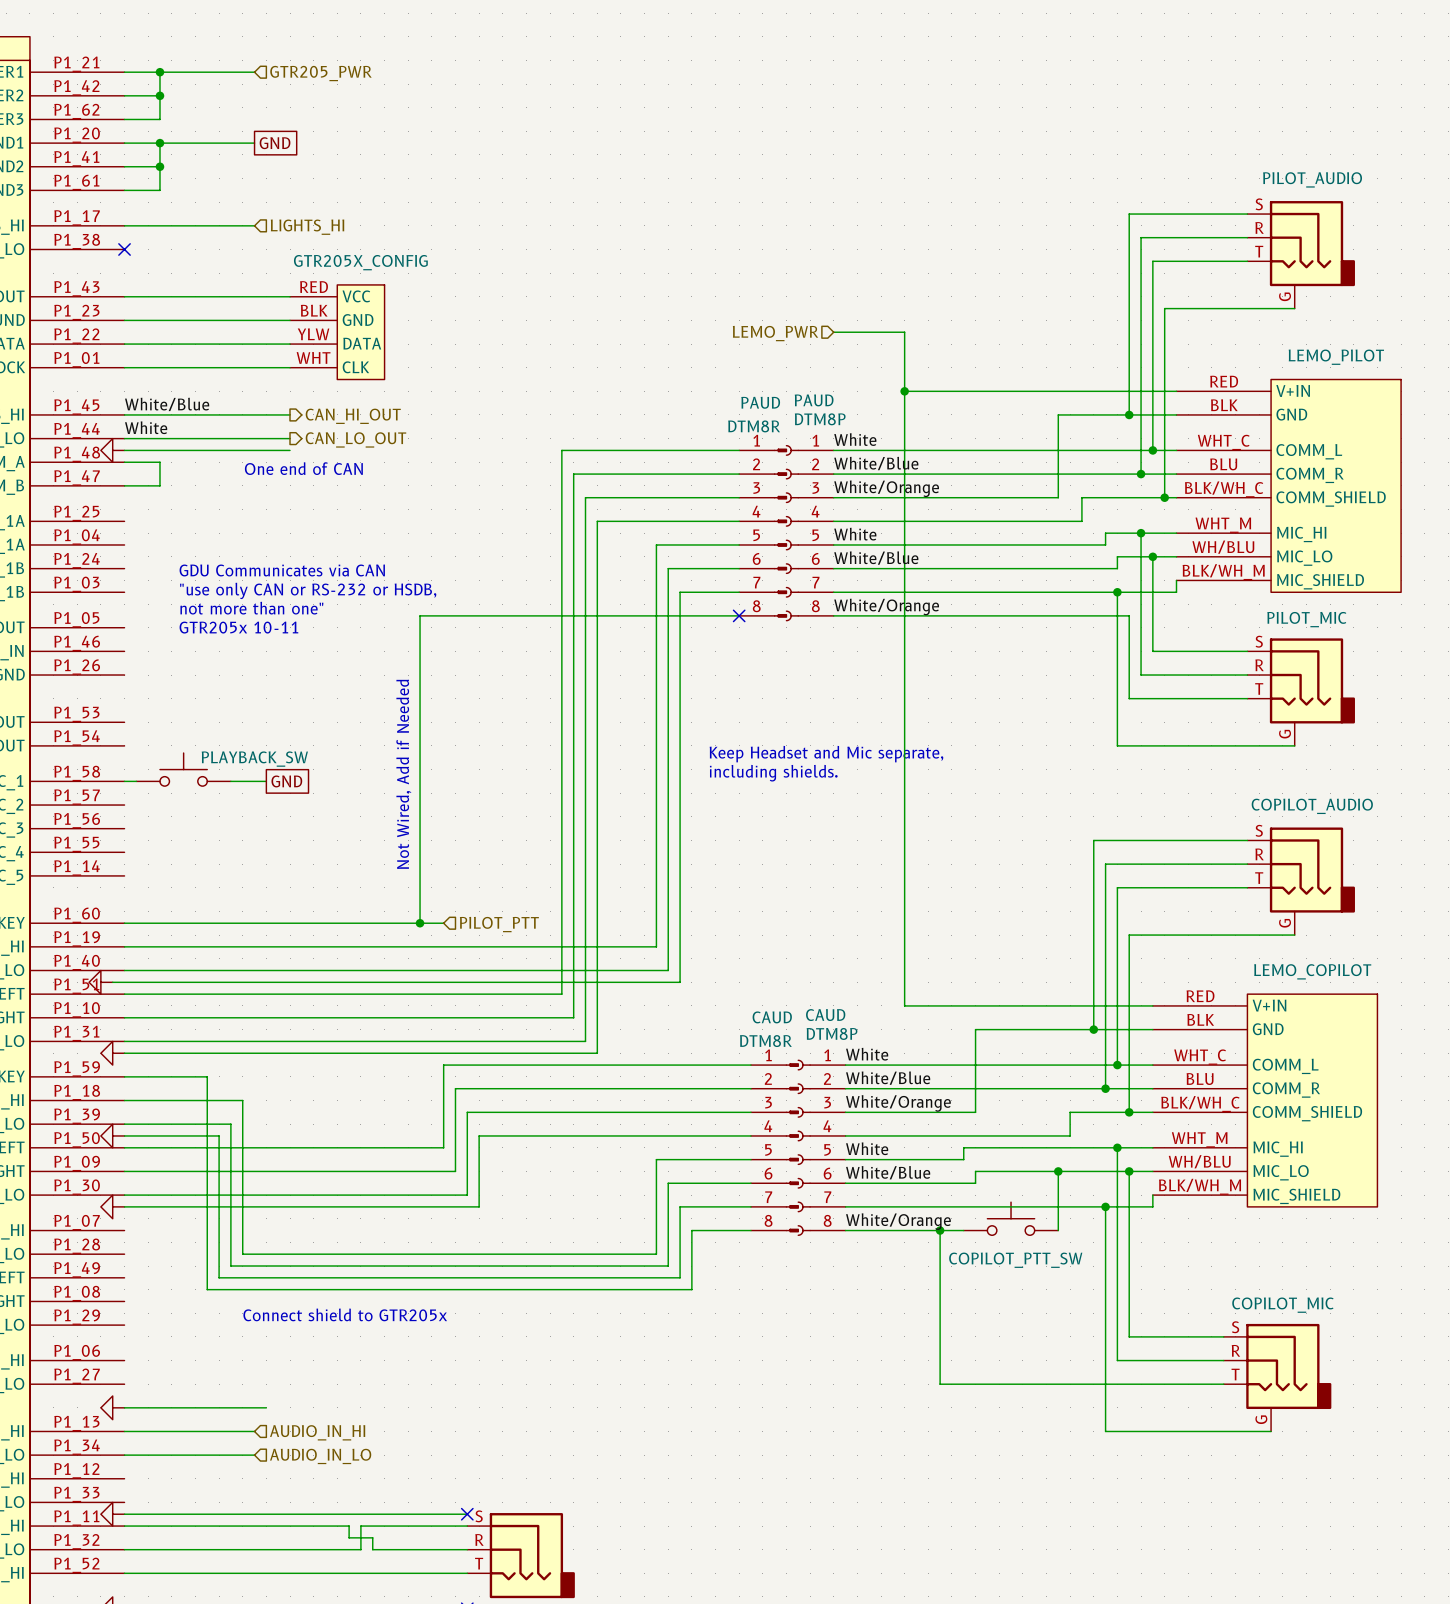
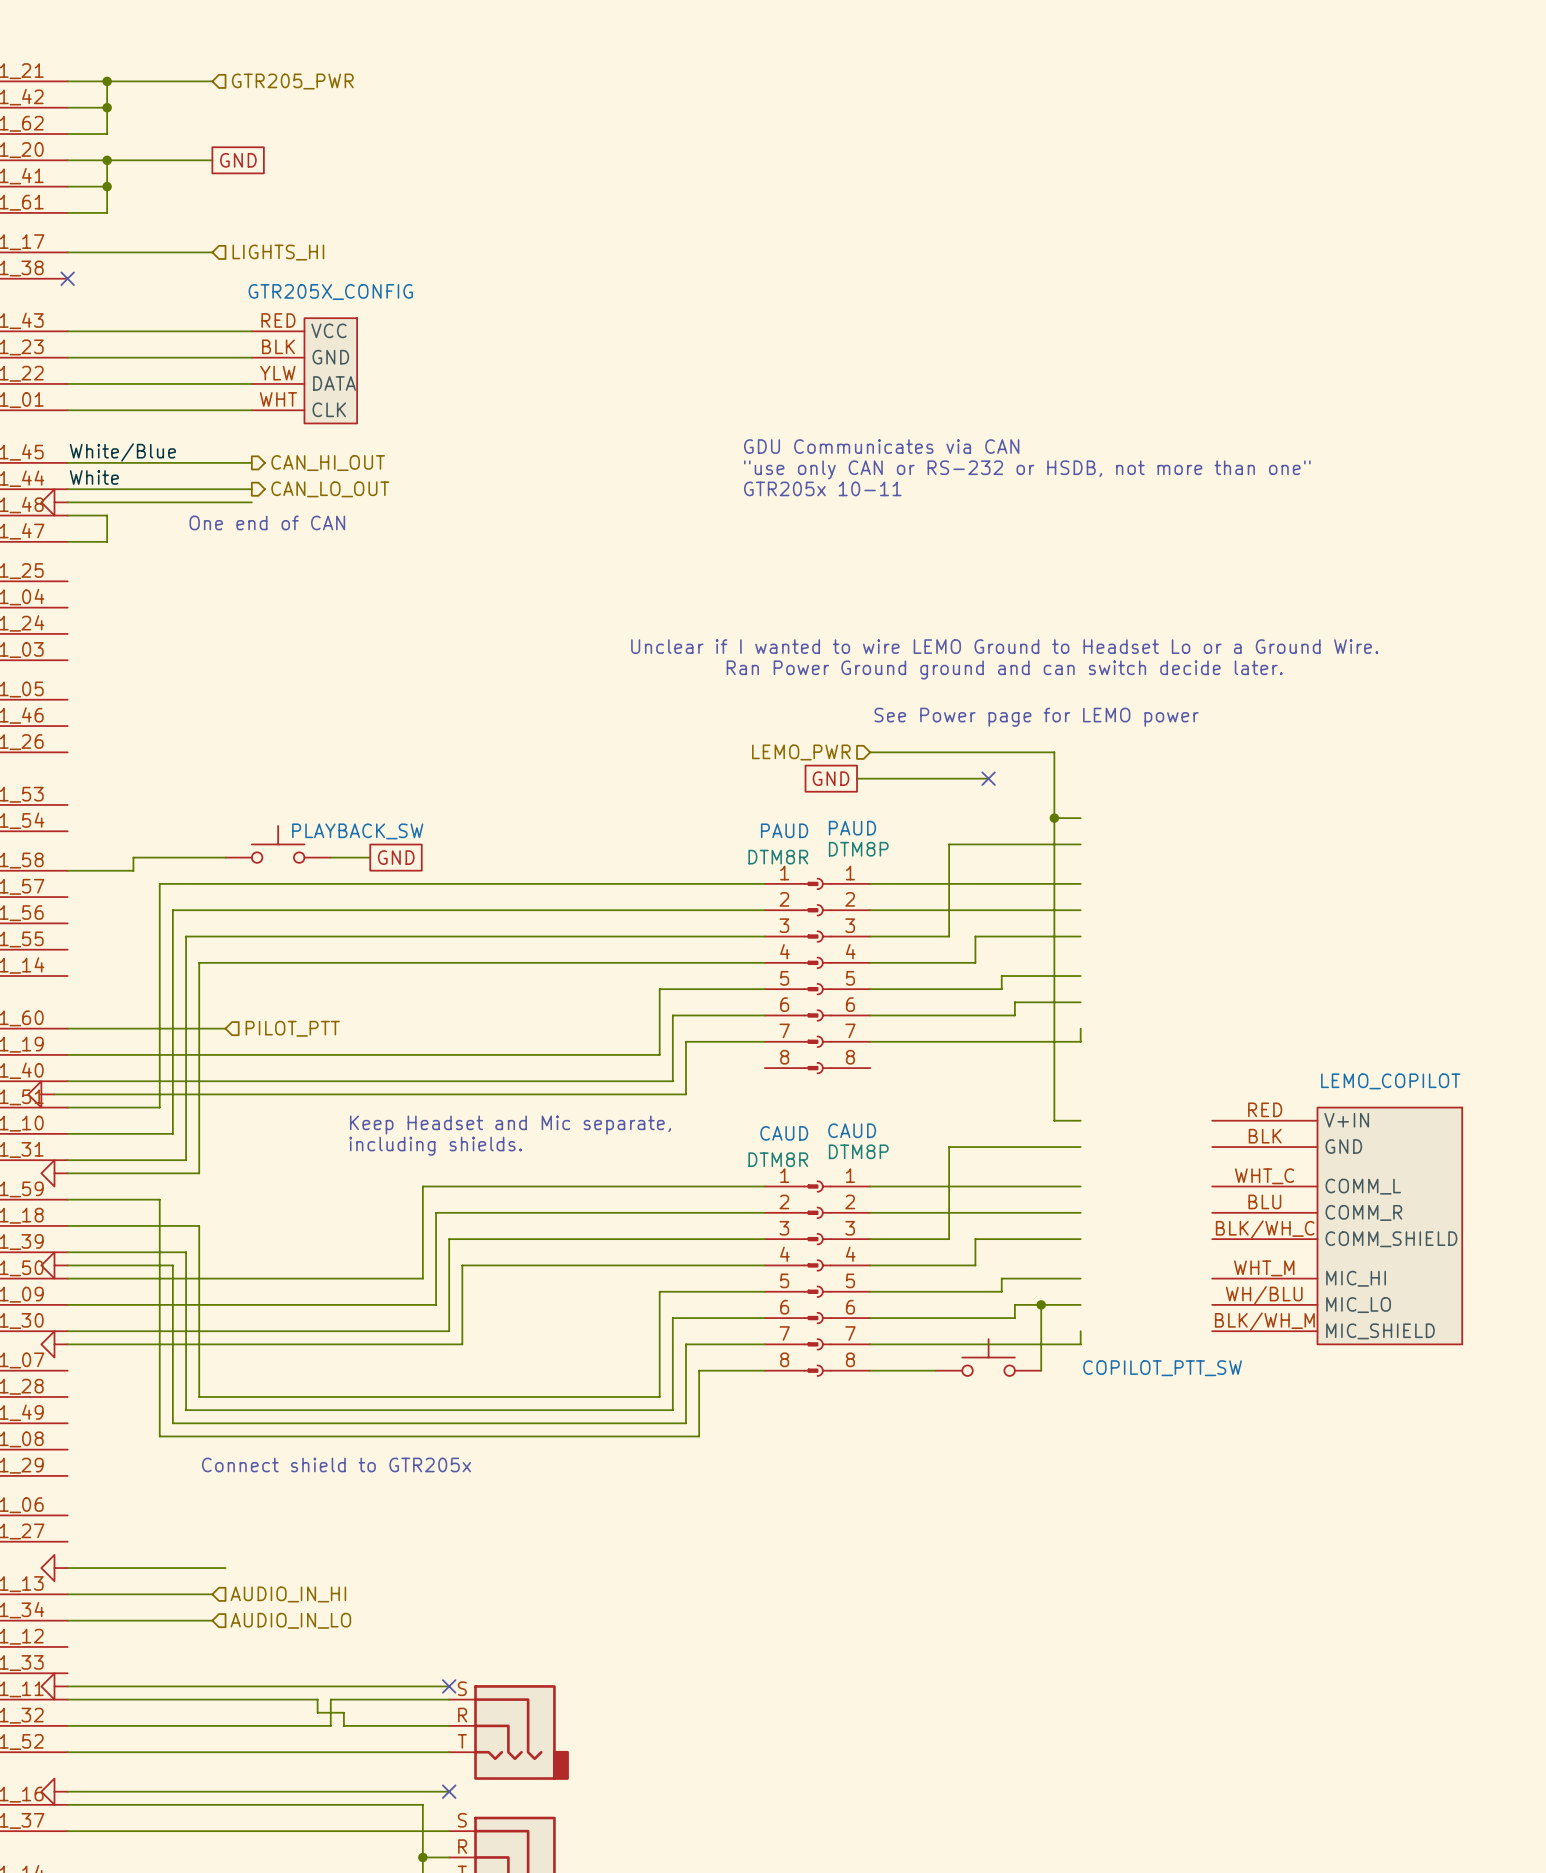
wire: (1247, 214) (1129, 214) (1129, 414) -> none
wire: (1247, 237) (1141, 237) (1141, 474) -> none
PILOT_AUDIO: (1301, 254) -> none
wire: (1247, 261) (1152, 261) (1152, 450) -> none
wire: (1294, 308) (1164, 308) (1164, 497) -> none
wire: (833, 332) (904, 332) (904, 1005) (1011, 1005) -> (870, 752) (1054, 752) (1054, 1120)
hierarchical label: LEMO_PWR (775, 333) -> none
wire: (904, 391) (1176, 391) -> none
junction: (904, 391) -> none
text: none -> GDU Communicates via CAN (881, 446)
junction: (1129, 414) -> none
wire: (1176, 414) (1058, 414) (1058, 497) (833, 497) -> none
text: none -> "use only CAN or RS-232 or HSDB, not more than one" (1027, 469)
text: none -> GTR205x 10-11 (822, 488)
label: White (855, 439) -> none
wire: (739, 450) (561, 450) (561, 994) (207, 994) -> (764, 883) (159, 883) (159, 1107)
wire: (833, 450) (1176, 450) -> none
junction: (1152, 450) -> none
label: White/Blue (876, 463) -> none
wire: (739, 474) (573, 474) (573, 1017) (219, 1017) -> (764, 910) (172, 910) (172, 1133)
wire: (833, 474) (1176, 474) -> none
junction: (1141, 474) -> none
LEMO_PILOT: (1288, 485) -> none
label: White/Orange (886, 488) -> none
wire: (739, 497) (585, 497) (585, 1041) (230, 1041) -> (764, 936) (186, 936) (186, 1160)
junction: (1164, 497) -> none
wire: (1176, 497) (1081, 497) (1081, 521) (833, 521) -> none
wire: (739, 521) (597, 521) (597, 1053) (242, 1053) -> (764, 962) (199, 962) (199, 1173)
PAUD: DTM8R (763, 533) -> none
PAUD: DTM8P (809, 533) -> none
wire: (1141, 533) (1141, 675) (1247, 675) -> none
junction: (1141, 533) -> none
wire: (1176, 533) (1105, 533) (1105, 544) (833, 544) -> none
label: White (855, 534) -> none
wire: (739, 544) (656, 544) (656, 887) -> (764, 989) (659, 989)
wire: (1152, 556) (1152, 651) (1247, 651) -> none
junction: (1152, 556) -> none
wire: (1176, 556) (1117, 556) (1117, 568) (833, 568) -> none
label: White/Blue (876, 558) -> none
wire: (739, 568) (668, 568) (668, 911) -> (764, 1015) (672, 1015)
text: GDU Communicates via CAN (282, 570) -> none
text: none -> Unclear if I wanted to wire LEMO Ground to Headset Lo or a Ground Wire. (1004, 646)
wire: (1176, 580) (1176, 592) (833, 592) -> none
text: "use only CAN or RS-232 or HSDB, (308, 590) -> none
wire: (739, 592) (680, 592) (680, 935) -> (764, 1041) (685, 1041)
wire: (1117, 592) (1117, 745) (1294, 745) -> none
junction: (1117, 592) -> none
text: none -> Ran Power Ground ground and can switch decide later. (1004, 669)
label: White/Orange (886, 606) -> none
text: not more than one" (251, 608) -> none
wire: (739, 615) (420, 615) (420, 923) -> none
no-connect mark: (739, 615) -> none
wire: (833, 615) (1129, 615) (1129, 698) (1247, 698) -> none
text: GTR205x 10-11 (238, 627) -> none
text: none -> See Power page for LEMO power (1036, 717)
hierarchical label: none -> LEMO_PWR (801, 752)
PILOT_MIC: (1301, 692) -> none
global label: none -> GND (831, 778)
wire: none -> (857, 778) (988, 778)
no-connect mark: none -> (988, 778)
wire: none -> (1054, 818) (1080, 818)
junction: none -> (1054, 818)
text: Keep Headset and Mic separate, (826, 754) -> none
wire: none -> (1080, 844) (949, 844) (949, 936) (870, 936)
PLAYBACK_SW position: (183, 769) -> (278, 844)
wire: none -> (225, 857) (133, 857) (133, 870) (80, 870)
text: including shields. (773, 773) -> none
text: Not Wired, Add if Needed (403, 774) -> none
wire: (230, 781) (266, 781) -> (330, 857) (370, 857)
global label position: GND (286, 781) -> GND (396, 857)
wire: none -> (870, 883) (1080, 883)
wire: none -> (870, 910) (1080, 910)
wire: none -> (1080, 936) (975, 936) (975, 962) (870, 962)
wire: (1247, 840) (1093, 840) (1093, 1029) -> none
wire: (1247, 864) (1105, 864) (1105, 1088) -> none
PAUD: none -> DTM8R (791, 976)
PAUD: none -> DTM8P (843, 976)
wire: none -> (1080, 976) (1001, 976) (1001, 989) (870, 989)
COPILOT_AUDIO: (1301, 881) -> none
wire: (1247, 887) (1117, 887) (1117, 1065) -> none
wire: none -> (1080, 1002) (1014, 1002) (1014, 1015) (870, 1015)
wire: (266, 923) (443, 923) -> none
junction: (420, 923) -> none
wire: none -> (1080, 1028) (1080, 1041) (870, 1041)
hierarchical label position: PILOT_PTT (499, 924) -> PILOT_PTT (292, 1028)
wire: (1294, 935) (1129, 935) (1129, 1112) -> none
wire: (1034, 1005) (1152, 1005) -> none
text: none -> Keep Headset and Mic separate, (510, 1125)
text: none -> including shields. (435, 1146)
wire: (975, 1029) (975, 1112) -> (1014, 1147) (949, 1147) (949, 1239)
wire: (1034, 1029) (1152, 1029) -> none
junction: (1093, 1029) -> none
label: White (867, 1054) -> none
wire: (1034, 1065) (1152, 1065) -> none
junction: (1117, 1065) -> none
label: White/Blue (888, 1078) -> none
wire: (1034, 1088) (1152, 1088) -> none
junction: (1105, 1088) -> none
label: White/Orange (898, 1103) -> none
wire: (916, 1112) (940, 1112) -> (975, 1265) (975, 1239)
junction: (1129, 1112) -> none
wire: (1152, 1112) (1070, 1112) (1070, 1135) (940, 1135) -> none
wire: (1034, 1147) (1152, 1147) -> none
wire: (1117, 1147) (1117, 1360) (1223, 1360) -> none
junction: (1117, 1147) -> none
label: White (867, 1148) -> none
junction: none -> (1041, 1304)
wire: (1034, 1171) (1152, 1171) -> none
wire: (1058, 1171) (1058, 1230) -> (1041, 1304) (1041, 1370)
junction: (1058, 1171) -> none
wire: (1129, 1171) (1129, 1336) (1223, 1336) -> none
junction: (1129, 1171) -> none
label: White/Blue (888, 1172) -> none
wire: (1152, 1195) (1152, 1206) (1034, 1206) -> (1080, 1331) (1080, 1344)
wire: (1105, 1206) (1105, 1431) (1271, 1431) -> none
junction: (1105, 1206) -> none
COPILOT_PTT_SW position: (1011, 1218) -> (988, 1357)
label: White/Orange (898, 1221) -> none
wire: (904, 1230) (963, 1230) -> (1014, 1239) (1080, 1239)
wire: (940, 1230) (940, 1384) (1223, 1384) -> none
junction: (940, 1230) -> none
COPILOT_PTT_SW name position: COPILOT_PTT_SW (1015, 1260) -> COPILOT_PTT_SW (1162, 1368)
COPILOT_MIC: (1277, 1377) -> none

